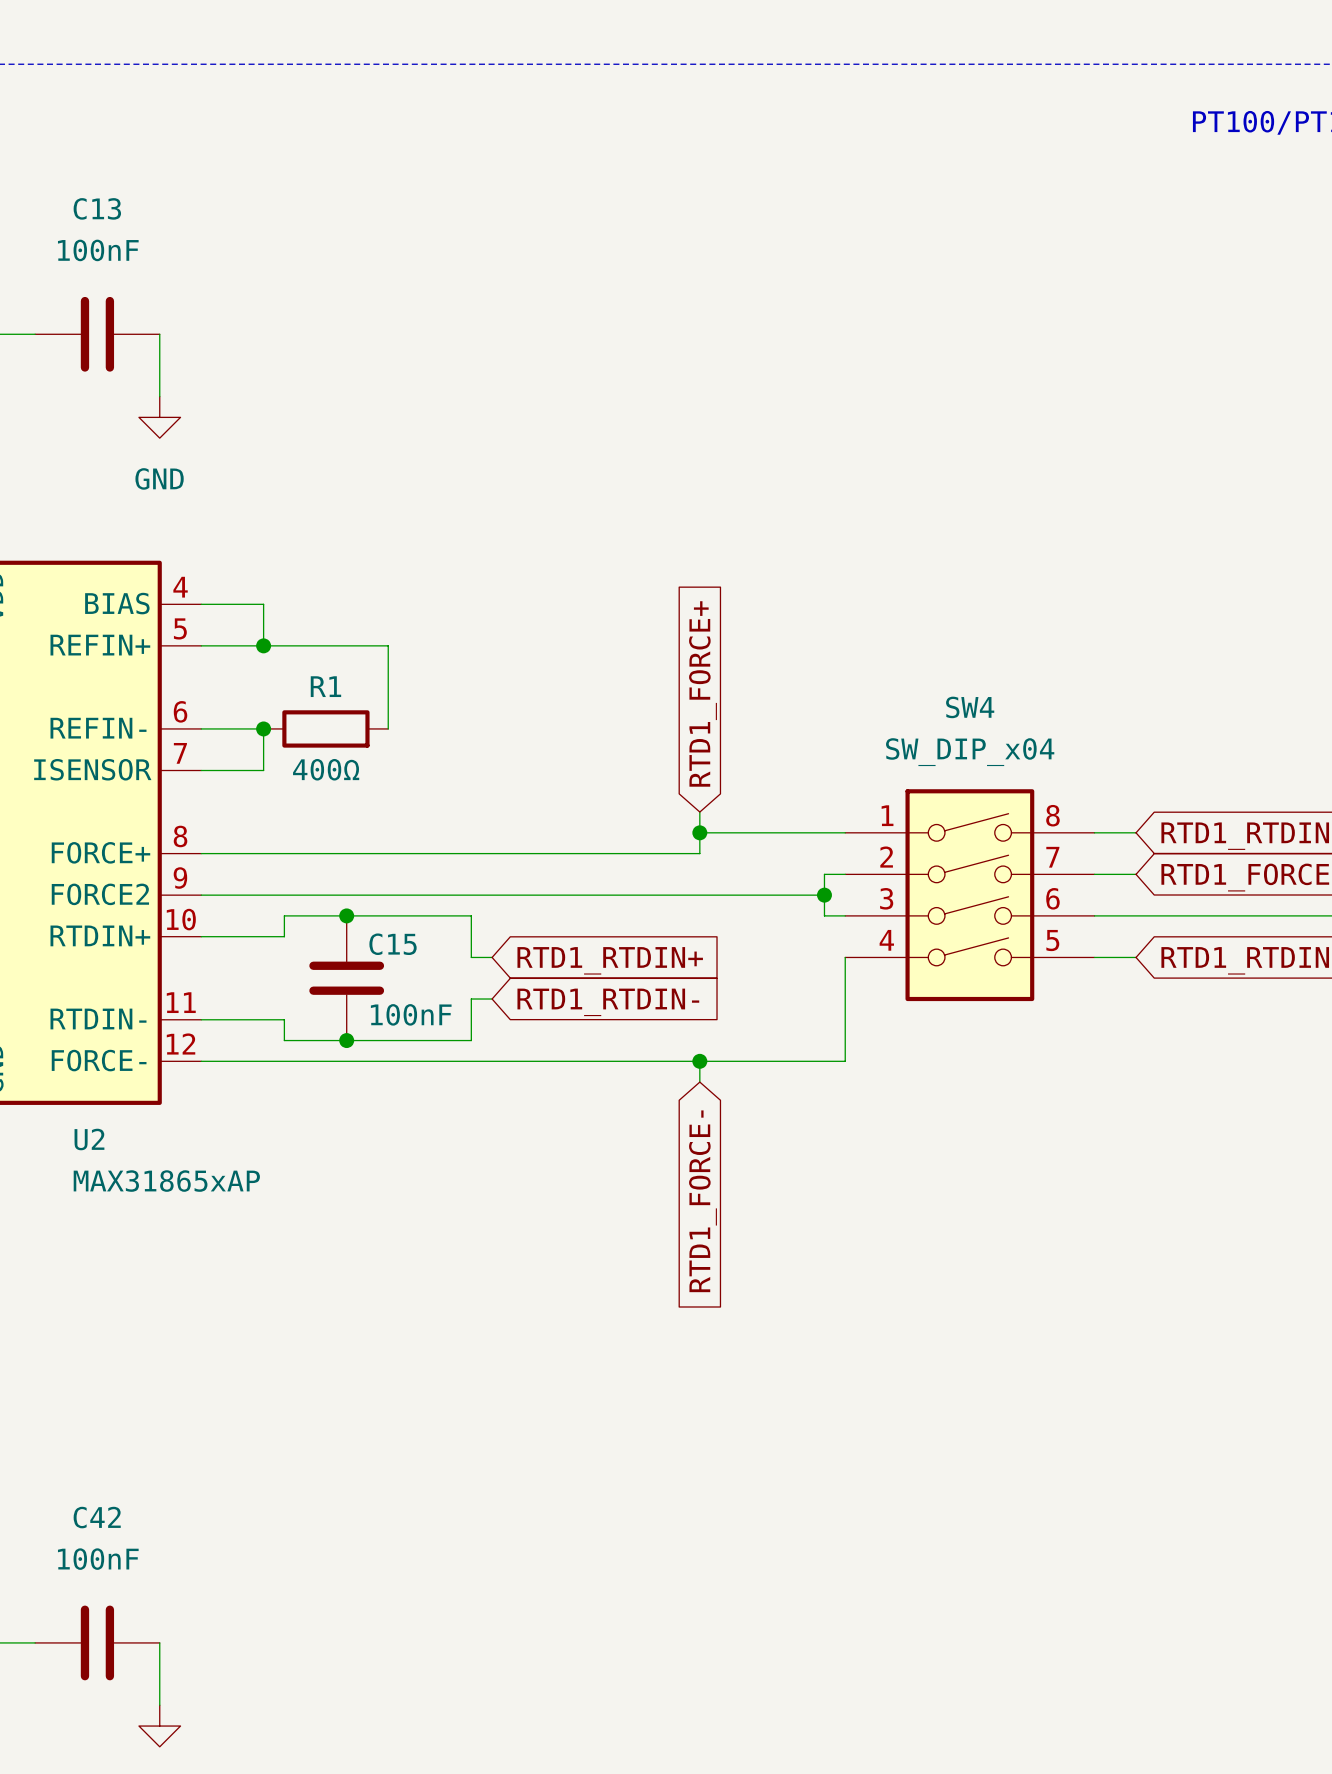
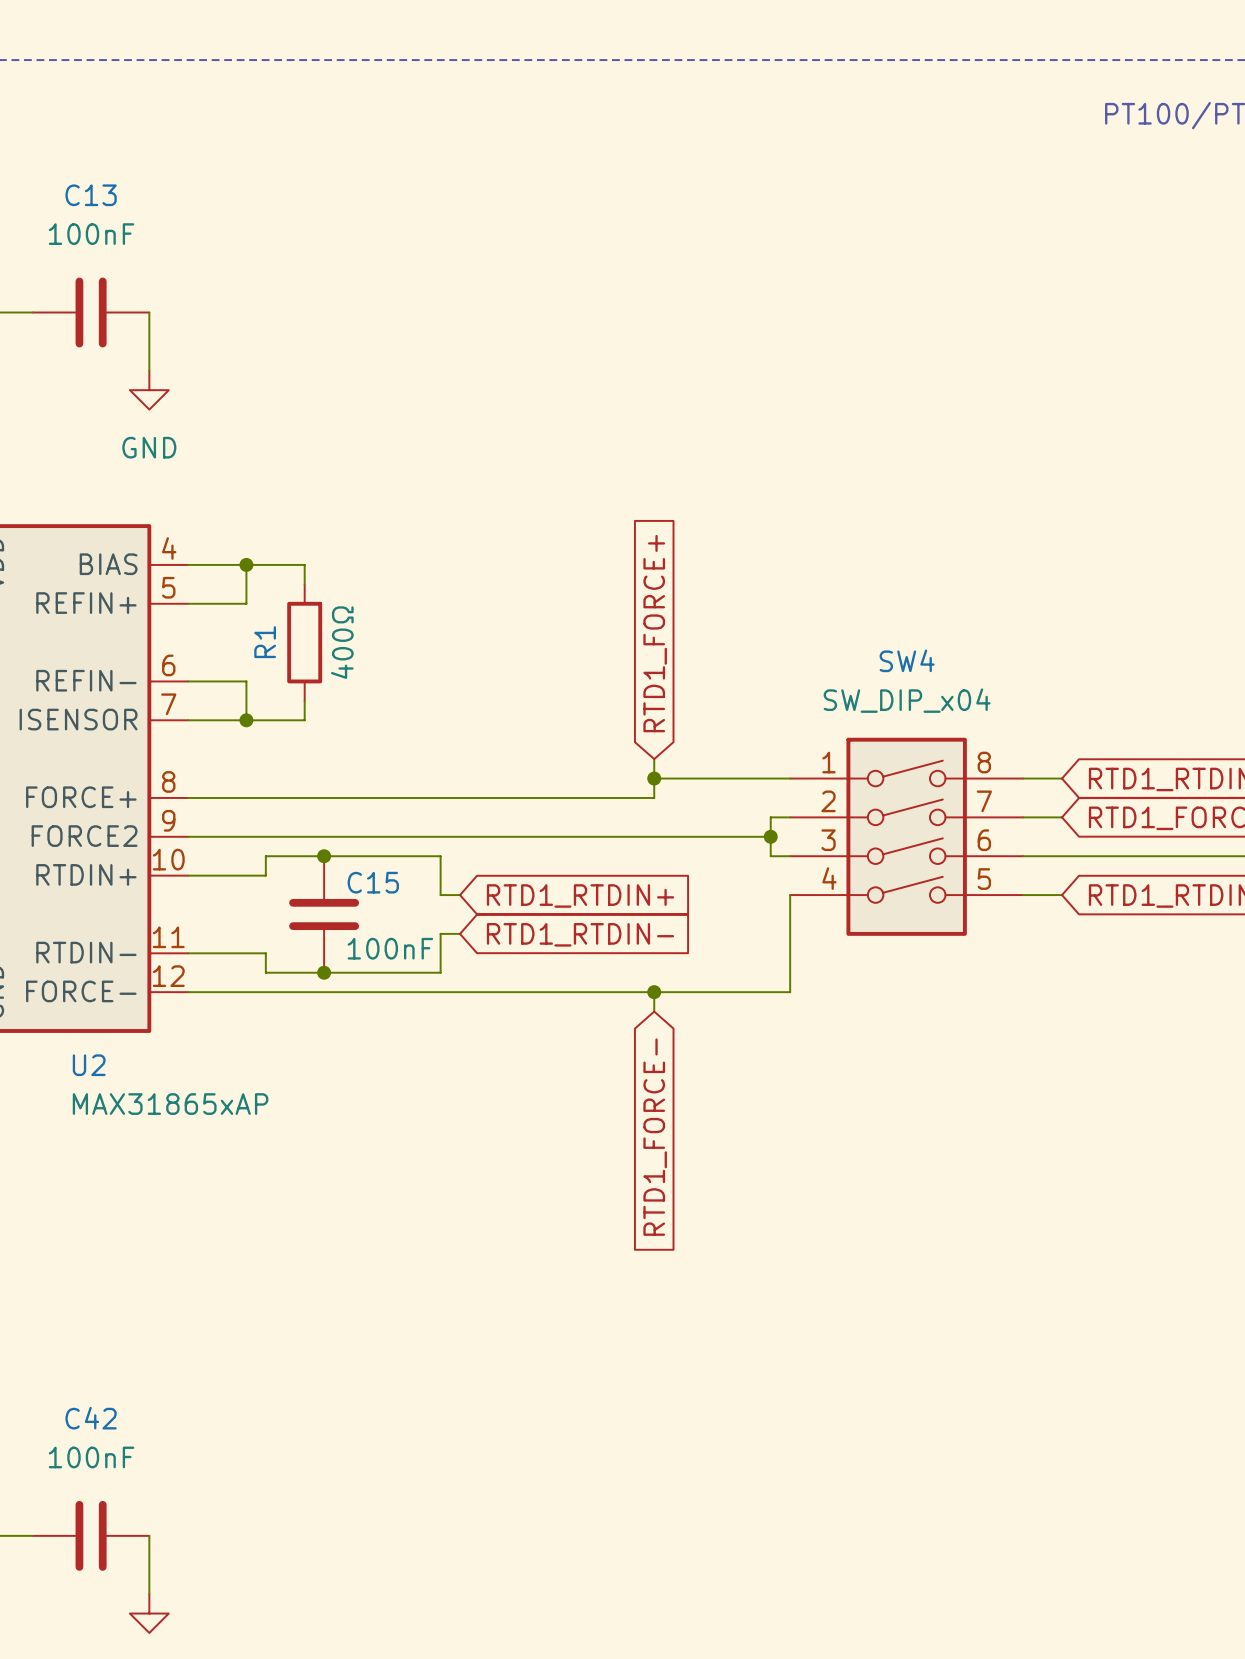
wire: none -> (246, 564) (304, 564) (304, 584)
wire: (263, 645) (388, 645) (388, 728) -> none
junction position: (263, 645) -> (246, 564)
R1 name position: R1 (325, 686) -> R1 (265, 642)
junction position: (263, 728) -> (246, 720)
R1 rotation: 0° (325, 728) -> 90° clockwise (304, 642)
wire: none -> (304, 700) (304, 720) (246, 720)
R1 value position: 400Ω (326, 769) -> 400Ω (342, 642)

